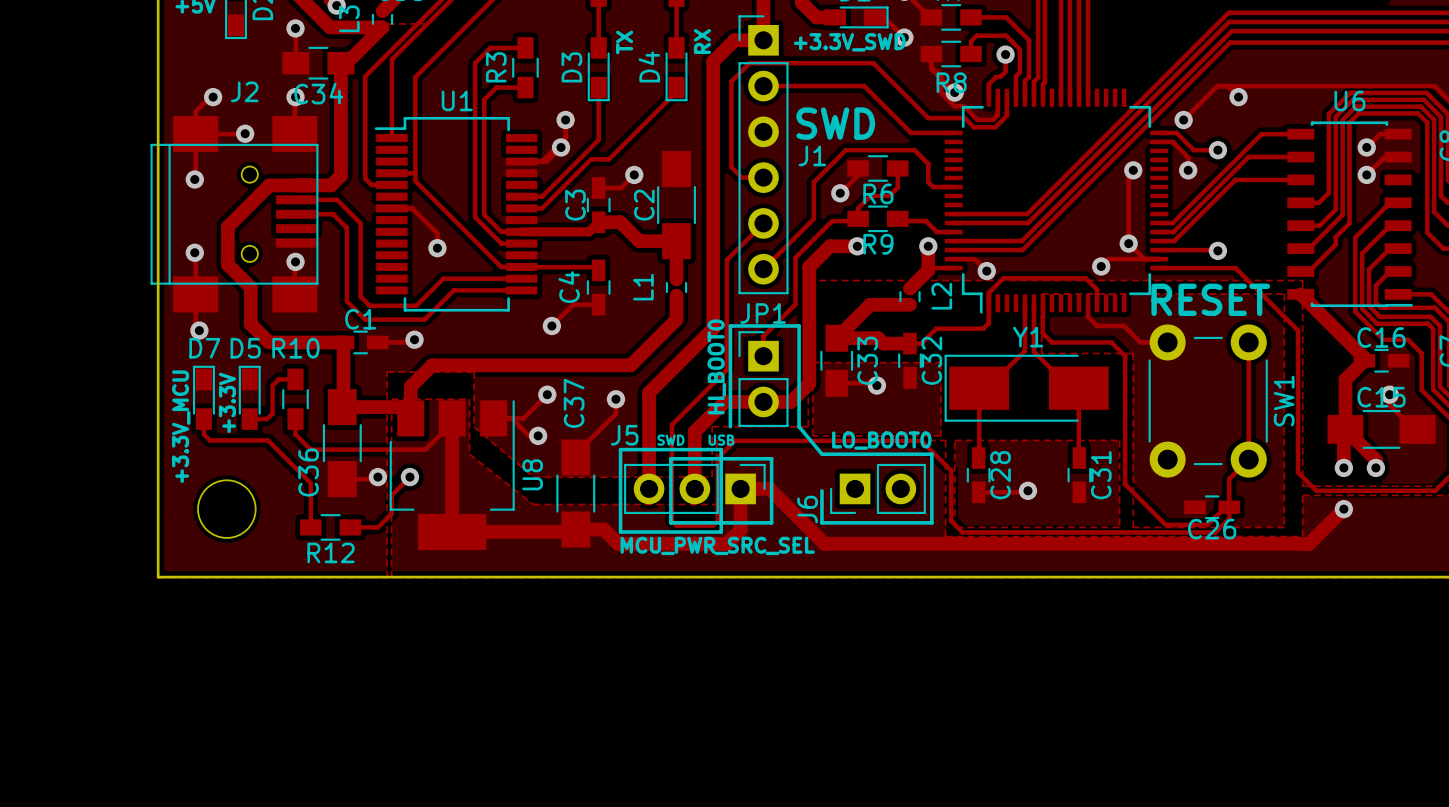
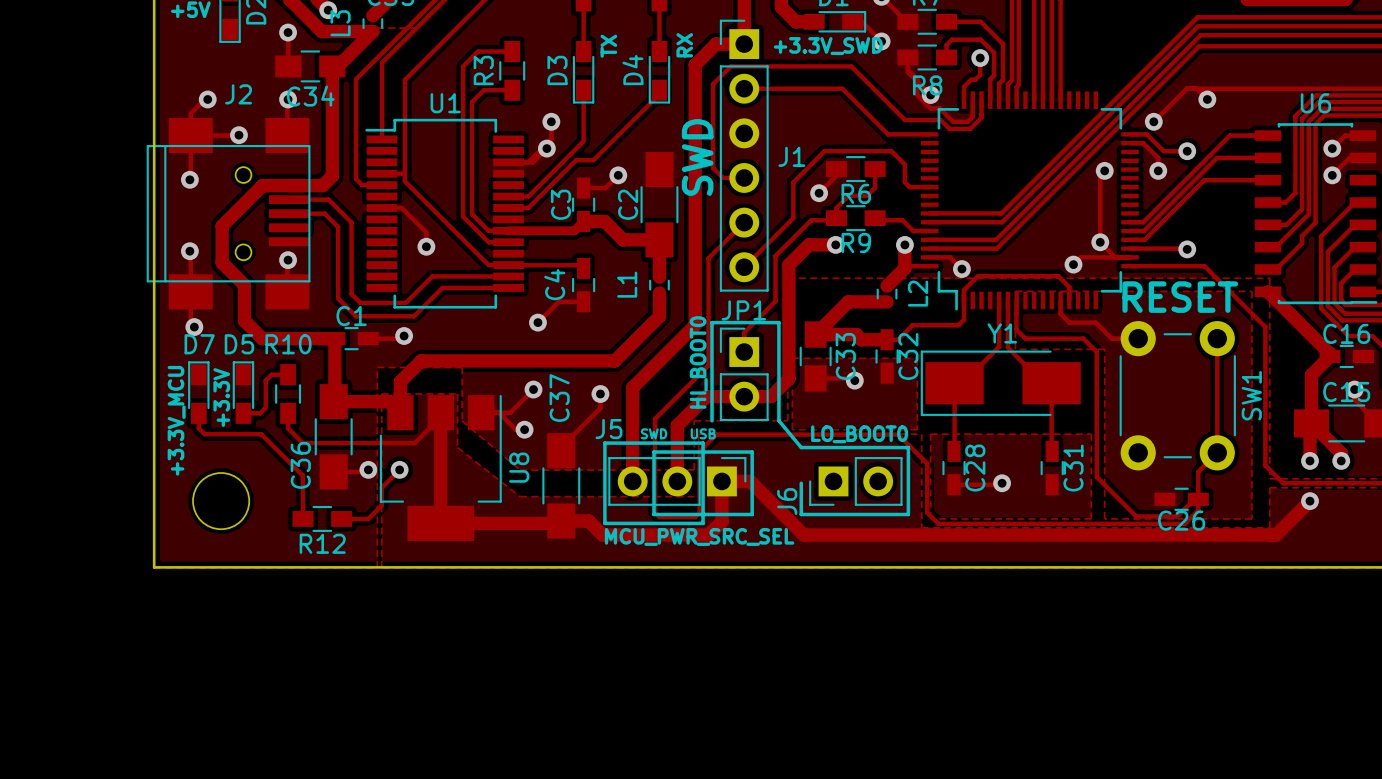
text rotation: 0° (835, 123) -> 90° counterclockwise (697, 157)
text position: SWD (835, 123) -> SWD (697, 157)

